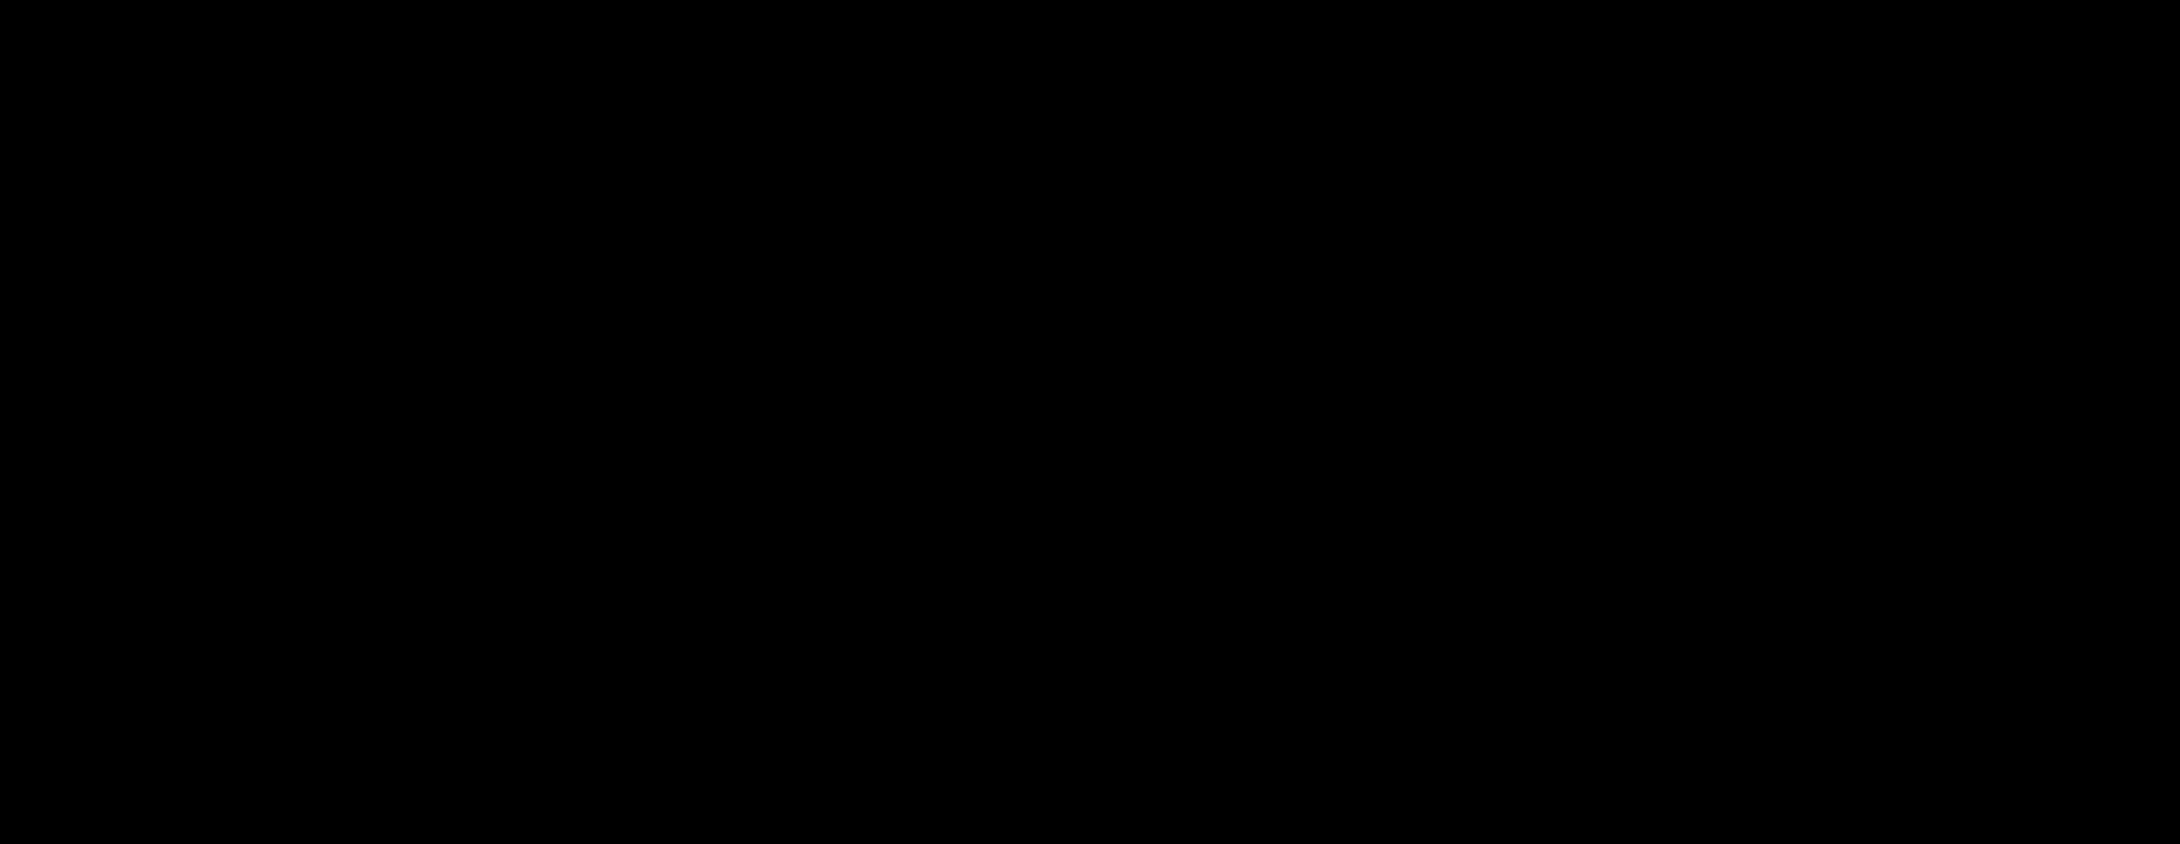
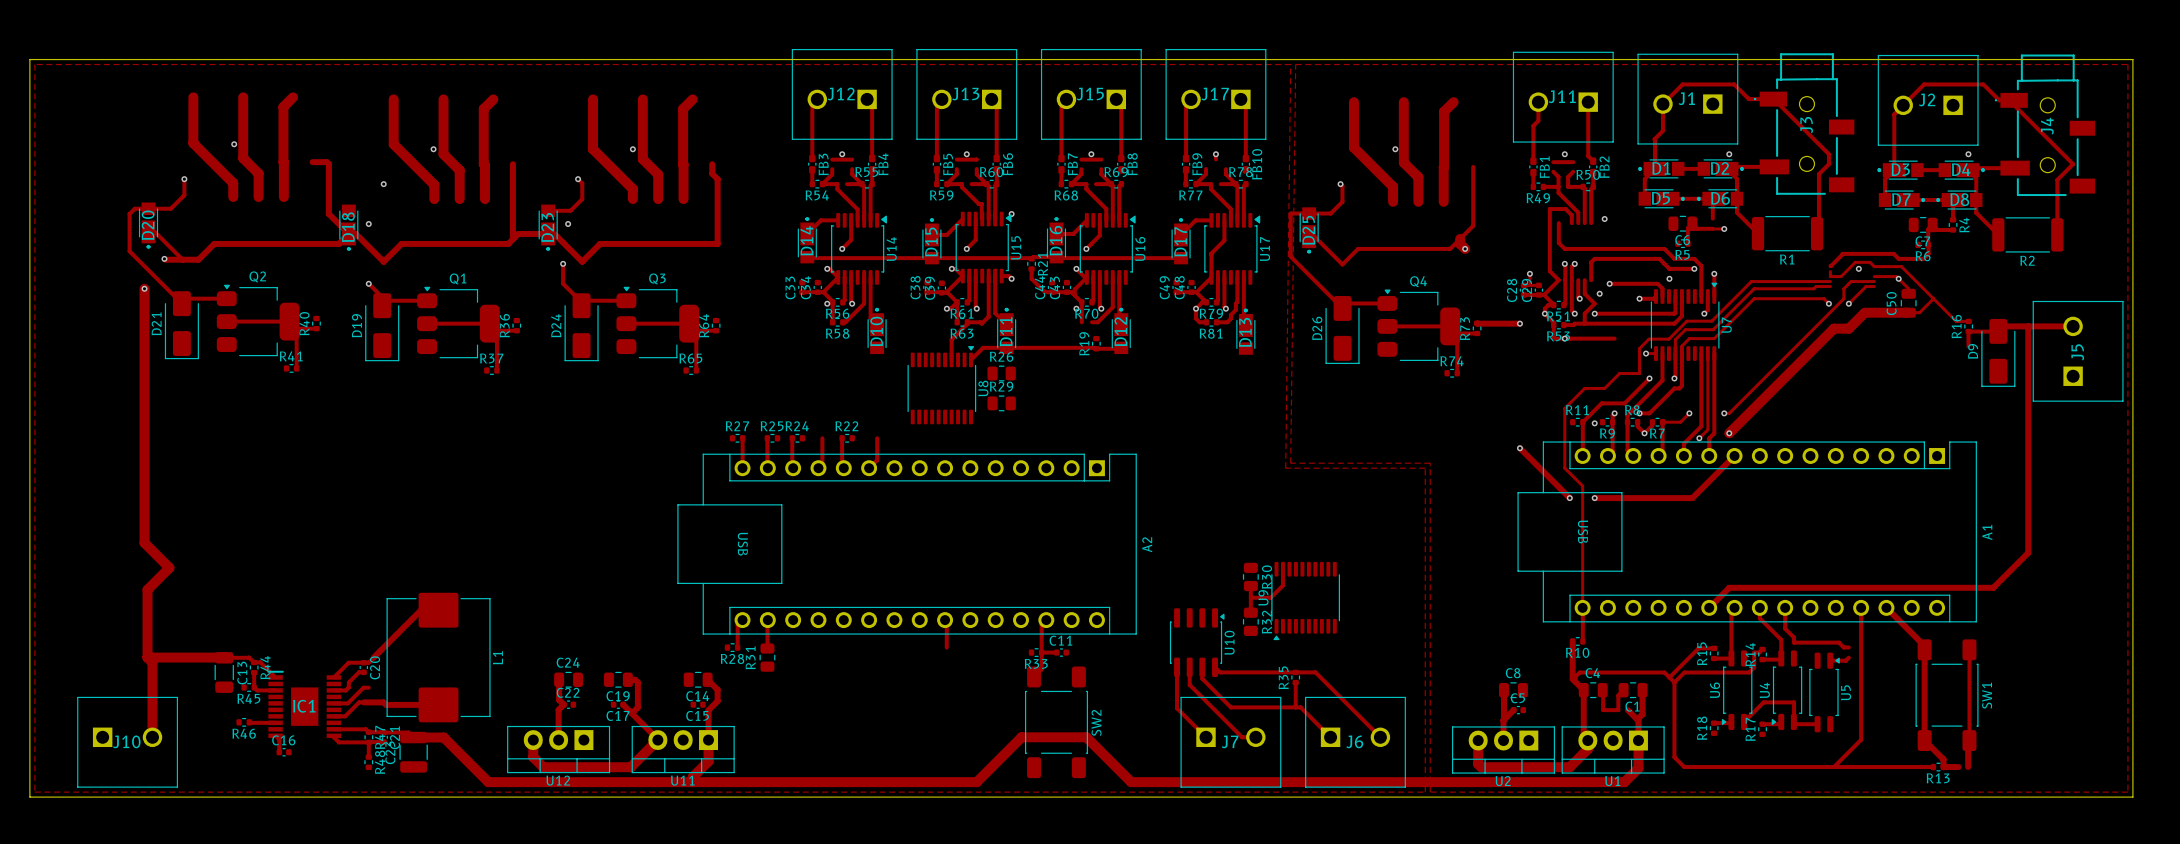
board edge: none -> (29, 59) (2132, 59) (2132, 797) (29, 797) (29, 59)
zone outline: none -> (34, 64) (1290, 64) (1285, 468) (1425, 468) (1425, 792) (34, 792) (34, 64)
zone outline: none -> (1295, 64) (2127, 64) (2127, 792) (1430, 792) (1430, 463) (1290, 463) (1295, 64)
J12: none -> (842, 94)
J13: none -> (966, 94)
J15: none -> (1091, 94)
J17: none -> (1215, 94)
track: none -> (193, 97) (193, 143) (233, 183) (233, 197)
track: none -> (243, 97) (243, 158) (258, 173) (258, 197)
track: none -> (293, 97) (283, 106) (283, 197)
J11: none -> (1563, 97)
track: none -> (393, 99) (393, 144) (434, 184) (434, 199)
track: none -> (443, 99) (443, 154) (459, 170) (459, 199)
track: none -> (493, 99) (483, 109) (484, 199)
track: none -> (593, 99) (593, 149) (632, 189) (632, 199)
track: none -> (642, 99) (642, 159) (658, 174) (658, 199)
track: none -> (692, 99) (683, 109) (683, 199)
track: none -> (817, 99) (812, 104) (812, 158)
track: none -> (867, 99) (872, 104) (872, 158)
track: none -> (941, 99) (936, 104) (936, 158)
track: none -> (991, 99) (996, 104) (996, 158)
track: none -> (1066, 99) (1061, 104) (1061, 158)
track: none -> (1116, 99) (1121, 104) (1121, 158)
track: none -> (1191, 99) (1186, 104) (1186, 158)
track: none -> (1240, 99) (1245, 104) (1245, 158)
J1: none -> (1687, 99)
J2: none -> (1928, 100)
track: none -> (1354, 102) (1354, 147) (1393, 186) (1393, 201)
track: none -> (1403, 102) (1403, 162) (1418, 177) (1418, 201)
track: none -> (1453, 102) (1444, 111) (1443, 201)
track: none -> (1538, 102) (1538, 120) (1533, 125) (1533, 161)
track: none -> (1588, 102) (1588, 156) (1593, 161)
J3: none -> (1804, 124)
J4: none -> (2044, 125)
via: none -> (234, 144)
via: none -> (433, 149)
via: none -> (632, 149)
via: none -> (1395, 149)
via: none -> (842, 154)
via: none -> (966, 154)
via: none -> (1091, 154)
track: none -> (1215, 154) (1215, 159)
via: none -> (1215, 154)
via: none -> (1564, 154)
via: none -> (1729, 154)
via: none -> (1968, 154)
track: none -> (832, 159) (852, 159)
track: none -> (976, 159) (956, 159)
track: none -> (1081, 159) (1101, 159)
track: none -> (312, 162) (326, 162) (328, 164) (328, 214) (348, 233)
track: none -> (1553, 162) (1573, 162)
track: none -> (512, 164) (513, 238)
track: none -> (712, 164) (712, 173) (717, 179) (717, 243) (600, 243) (582, 261) (554, 233) (518, 233) (508, 243) (401, 243) (383, 261) (355, 233) (348, 233)
FB3: none -> (812, 164)
FB4: none -> (872, 164)
FB5: none -> (936, 164)
FB6: none -> (996, 164)
FB7: none -> (1061, 164)
FB8: none -> (1121, 164)
FB9: none -> (1186, 164)
FB10: none -> (1245, 164)
track: none -> (1473, 166) (1473, 225) (1450, 248) (1358, 248) (1342, 264) (1314, 236) (1309, 236)
FB1: none -> (1533, 166)
FB2: none -> (1593, 166)
track: none -> (1774, 166) (1731, 166) (1727, 168) (1736, 178) (1736, 212) (1758, 233)
track: none -> (976, 168) (976, 174) (988, 186) (988, 219)
track: none -> (1205, 168) (1205, 174) (1196, 184) (1211, 184) (1211, 189) (1230, 209) (1230, 220)
D1: none -> (1661, 168)
track: none -> (1678, 168) (1703, 168)
D2: none -> (1720, 168)
track: none -> (2015, 168) (1970, 168) (1968, 170) (1976, 178) (1976, 212) (1998, 234)
track: none -> (812, 169) (812, 184)
track: none -> (832, 169) (832, 174) (822, 184) (837, 184) (837, 189) (857, 209) (857, 220)
track: none -> (852, 169) (852, 174) (864, 186) (864, 220)
track: none -> (872, 169) (872, 184)
track: none -> (936, 169) (936, 184)
track: none -> (956, 169) (956, 174) (946, 184) (962, 184) (962, 187) (978, 204) (981, 204) (982, 219)
track: none -> (1061, 169) (1061, 184)
track: none -> (1081, 169) (1081, 174) (1071, 184) (1086, 184) (1086, 189) (1106, 209) (1106, 220)
track: none -> (1101, 169) (1101, 174) (1112, 185) (1112, 220)
track: none -> (1186, 169) (1185, 184)
track: none -> (1225, 169) (1225, 174) (1237, 185) (1237, 220)
track: none -> (996, 170) (995, 219)
D3: none -> (1900, 170)
track: none -> (1917, 170) (1944, 170)
D4: none -> (1961, 170)
track: none -> (1553, 171) (1558, 176) (1558, 192) (1578, 212) (1578, 223)
track: none -> (1573, 171) (1568, 176) (1568, 186) (1584, 188) (1584, 223)
track: none -> (1533, 172) (1533, 186)
track: none -> (1593, 172) (1591, 223)
track: none -> (184, 179) (184, 195) (170, 208) (134, 208) (129, 214) (129, 251) (181, 303) (186, 298) (226, 298)
via: none -> (184, 179)
track: none -> (578, 179) (582, 183) (582, 199) (570, 210) (548, 210)
via: none -> (578, 179)
via: none -> (383, 184)
R54: none -> (817, 184)
track: none -> (846, 184) (862, 184)
R55: none -> (867, 184)
track: none -> (872, 184) (870, 185) (870, 220)
R59: none -> (941, 184)
track: none -> (971, 184) (986, 184)
R60: none -> (991, 184)
R68: none -> (1066, 184)
track: none -> (1095, 184) (1111, 184)
R69: none -> (1116, 184)
track: none -> (1121, 184) (1119, 186) (1119, 220)
R77: none -> (1190, 184)
track: none -> (1220, 184) (1235, 184)
R78: none -> (1240, 184)
track: none -> (1245, 184) (1243, 186) (1243, 220)
track: none -> (1340, 184) (1342, 186) (1342, 201) (1330, 213) (1290, 214) (1290, 256) (1342, 308) (1347, 303) (1387, 303)
via: none -> (1340, 184)
R49: none -> (1538, 186)
track: none -> (1543, 186) (1558, 186)
R50: none -> (1588, 186)
track: none -> (1644, 198) (1644, 179) (1655, 168) (1654, 139) (1662, 130) (1662, 104) (1682, 84) (1734, 84) (1748, 99) (1773, 99) (1828, 154) (1828, 164) (1818, 174) (1818, 231) (1817, 233)
D5: none -> (1661, 198)
track: none -> (1667, 198) (1713, 198) (1712, 218)
D6: none -> (1720, 198)
track: none -> (1885, 200) (1885, 179) (1894, 170) (1894, 114) (1924, 84) (1983, 84) (1999, 100) (2014, 100) (2014, 105) (2073, 164) (2057, 179) (2057, 234)
D7: none -> (1901, 200)
track: none -> (1908, 200) (1953, 200) (1953, 219)
D8: none -> (1959, 200)
via: none -> (1011, 214)
track: none -> (962, 219) (946, 234) (931, 234)
track: none -> (975, 219) (975, 239) (966, 248)
via: none -> (1604, 219)
track: none -> (838, 220) (820, 220) (807, 233)
track: none -> (851, 220) (851, 239) (842, 248)
track: none -> (1086, 220) (1073, 233) (1056, 233)
track: none -> (1099, 220) (1099, 235) (1086, 248)
track: none -> (1211, 220) (1195, 220) (1181, 234)
track: none -> (1224, 220) (1224, 240) (1210, 253) (1211, 277) (1196, 292) (1176, 292)
track: none -> (1558, 223) (1558, 242) (1564, 248) (1664, 248) (1674, 258) (1694, 258) (1701, 265) (1701, 296)
track: none -> (1571, 223) (1571, 215) (1565, 209) (1549, 209) (1549, 271) (1558, 280) (1544, 294)
C6: none -> (1682, 223)
via: none -> (368, 224)
via: none -> (568, 224)
C7: none -> (1923, 224)
R4: none -> (1953, 224)
D20: none -> (148, 225)
D18: none -> (348, 227)
D23: none -> (548, 227)
track: none -> (1724, 228) (1697, 228) (1692, 223) (1687, 228) (1687, 243)
via: none -> (1724, 228)
D25: none -> (1309, 230)
track: none -> (1953, 230) (1937, 230) (1932, 224) (1928, 229) (1928, 253) (1923, 258) (1898, 258) (1893, 253) (1842, 253) (1830, 266)
track: none -> (148, 231) (154, 231) (182, 259)
track: none -> (348, 233) (338, 243) (214, 243) (198, 259) (164, 258)
R1: none -> (1787, 233)
R2: none -> (2027, 234)
track: none -> (1460, 238) (1460, 243) (1465, 248)
D14: none -> (807, 240)
D16: none -> (1056, 240)
D15: none -> (931, 241)
D17: none -> (1181, 241)
R5: none -> (1682, 243)
R6: none -> (1923, 244)
U15: none -> (983, 247)
via: none -> (842, 248)
U14: none -> (858, 248)
via: none -> (966, 248)
via: none -> (1086, 248)
U16: none -> (1107, 248)
U17: none -> (1232, 248)
via: none -> (1465, 248)
track: none -> (807, 257) (1181, 258)
via: none -> (164, 258)
track: none -> (563, 263) (563, 283) (581, 302) (581, 305) (586, 300) (626, 300)
via: none -> (563, 263)
R21: none -> (1031, 263)
track: none -> (1564, 263) (1563, 305)
via: none -> (1564, 263)
track: none -> (1574, 263) (1571, 266) (1571, 310) (1574, 313)
via: none -> (1574, 263)
track: none -> (827, 268) (838, 277) (823, 292)
via: none -> (827, 268)
track: none -> (951, 268) (955, 268) (962, 276) (947, 292)
via: none -> (951, 268)
track: none -> (1031, 268) (1031, 278) (1044, 292) (1071, 292) (1081, 302) (1081, 322)
track: none -> (1076, 268) (1086, 277) (1074, 289) (1074, 295)
via: none -> (1076, 268)
track: none -> (1694, 268) (1669, 268) (1659, 258) (1594, 258) (1591, 262) (1591, 280)
via: none -> (1694, 268)
via: none -> (1858, 268)
track: none -> (1830, 271) (1830, 276) (1841, 276) (1855, 262) (1870, 262) (1874, 266) (1901, 266) (1956, 321) (1968, 321)
track: none -> (1529, 273) (1529, 285)
via: none -> (1529, 273)
track: none -> (1714, 273) (1714, 296)
via: none -> (1714, 273)
track: none -> (969, 276) (969, 300) (967, 302)
track: none -> (975, 276) (976, 308)
track: none -> (988, 276) (988, 316) (981, 323) (967, 322) (951, 339) (951, 359)
track: none -> (995, 276) (995, 313) (1006, 324)
track: none -> (1001, 276) (1008, 276) (1011, 278)
track: none -> (1874, 276) (1896, 276) (1908, 288) (1908, 293)
track: none -> (844, 277) (844, 300) (842, 302)
track: none -> (851, 277) (852, 303)
track: none -> (864, 277) (864, 303) (845, 322) (842, 322)
track: none -> (870, 277) (870, 318) (877, 324)
track: none -> (1093, 277) (1091, 302)
track: none -> (1099, 277) (1101, 308)
track: none -> (1112, 277) (1112, 307) (1097, 322) (1091, 322)
track: none -> (1119, 277) (1119, 322) (1121, 324)
track: none -> (1217, 277) (1216, 302)
track: none -> (1224, 277) (1225, 308)
track: none -> (1237, 277) (1235, 309) (1227, 322) (1216, 322)
track: none -> (1243, 277) (1243, 323) (1245, 325)
via: none -> (1011, 278)
via: none -> (1669, 278)
via: none -> (1898, 278)
track: none -> (1578, 280) (1579, 298)
track: none -> (1584, 280) (1584, 293) (1594, 303) (1584, 313) (1584, 323)
track: none -> (1830, 281) (1751, 281) (1711, 321) (1686, 321) (1668, 339) (1649, 339) (1639, 348) (1639, 373) (1619, 373) (1604, 388) (1584, 388) (1564, 408) (1564, 468) (1582, 486) (1582, 641)
track: none -> (1874, 281) (1851, 281) (1843, 288) (1843, 298) (1729, 413) (1724, 413)
track: none -> (368, 283) (382, 297) (382, 305) (387, 300) (427, 300)
via: none -> (368, 283)
track: none -> (1609, 283) (1657, 283) (1662, 288) (1662, 296)
via: none -> (1609, 283)
track: none -> (1523, 285) (1538, 285)
track: none -> (1830, 286) (1816, 286) (1813, 288) (1754, 288) (1713, 329) (1685, 329) (1675, 339) (1674, 378)
track: none -> (1874, 286) (1866, 286) (1848, 303)
C33: none -> (802, 287)
C34: none -> (817, 287)
C38: none -> (927, 287)
C39: none -> (941, 287)
C44: none -> (1052, 287)
C43: none -> (1066, 287)
C49: none -> (1176, 287)
C48: none -> (1191, 287)
track: none -> (144, 288) (144, 542) (169, 567) (147, 589) (147, 657)
via: none -> (144, 288)
C28: none -> (1523, 290)
C29: none -> (1538, 290)
track: none -> (802, 292) (823, 292)
track: none -> (823, 292) (832, 301) (832, 322)
track: none -> (927, 292) (947, 292)
track: none -> (947, 292) (957, 302)
track: none -> (1196, 292) (1206, 302) (1202, 302) (1196, 308) (1196, 318) (1199, 322) (1206, 322)
via: none -> (1599, 293)
track: none -> (1523, 294) (1544, 294)
track: none -> (1544, 294) (1553, 304) (1548, 305) (1544, 308) (1544, 313) (1553, 322) (1554, 338) (1614, 338)
track: none -> (1656, 296) (1653, 298) (1639, 298)
track: none -> (1675, 296) (1674, 313) (1594, 313)
track: none -> (1681, 296) (1681, 316) (1674, 323) (1563, 325)
track: none -> (1707, 296) (1707, 310) (1704, 313)
via: none -> (1579, 298)
via: none -> (1639, 298)
track: none -> (1933, 298) (1919, 312) (1864, 312) (1848, 328) (1833, 328) (1729, 433)
R56: none -> (837, 302)
track: none -> (957, 302) (950, 308) (946, 308)
track: none -> (957, 302) (957, 322)
R61: none -> (962, 302)
R70: none -> (1086, 302)
R79: none -> (1211, 302)
via: none -> (827, 303)
via: none -> (852, 303)
track: none -> (1828, 303) (1823, 298) (1754, 298) (1714, 338) (1689, 338) (1681, 346) (1681, 385) (1679, 388) (1674, 388) (1649, 413) (1639, 413)
via: none -> (1828, 303)
via: none -> (1848, 303)
C50: none -> (1908, 303)
R51: none -> (1558, 305)
via: none -> (946, 308)
via: none -> (976, 308)
via: none -> (1076, 308)
via: none -> (1101, 308)
via: none -> (1196, 308)
via: none -> (1225, 308)
via: none -> (1544, 313)
via: none -> (1574, 313)
via: none -> (1594, 313)
via: none -> (1704, 313)
Q2: none -> (258, 320)
track: none -> (226, 321) (289, 321) (296, 328)
U7: none -> (1685, 321)
Q1: none -> (458, 322)
Q3: none -> (657, 322)
R58: none -> (837, 322)
R63: none -> (962, 322)
R81: none -> (1211, 322)
R40: none -> (316, 323)
track: none -> (427, 323) (489, 323) (496, 330)
track: none -> (626, 323) (689, 323) (696, 330)
track: none -> (1477, 323) (1519, 323)
via: none -> (1519, 323)
D21: none -> (181, 325)
R36: none -> (516, 325)
R64: none -> (716, 325)
Q4: none -> (1418, 325)
R53: none -> (1558, 325)
track: none -> (1387, 326) (1450, 326) (1457, 333)
R16: none -> (1968, 326)
track: none -> (2028, 326) (2028, 552) (1993, 587) (1729, 587) (1709, 607)
track: none -> (2073, 326) (2003, 326) (1998, 331) (1968, 331) (1968, 346)
D19: none -> (382, 327)
D24: none -> (581, 327)
track: none -> (296, 328) (296, 368)
track: none -> (296, 328) (316, 328)
R73: none -> (1477, 328)
D26: none -> (1342, 329)
track: none -> (496, 330) (496, 370)
track: none -> (496, 330) (516, 330)
track: none -> (696, 330) (716, 330)
track: none -> (696, 330) (696, 370)
D10: none -> (877, 330)
D11: none -> (1006, 330)
D12: none -> (1121, 330)
D13: none -> (1245, 331)
track: none -> (1457, 333) (1477, 333)
track: none -> (1457, 333) (1457, 373)
via: none -> (1564, 338)
R19: none -> (1096, 343)
track: none -> (1121, 347) (983, 347) (971, 359)
J5: none -> (2078, 351)
D9: none -> (1998, 352)
track: none -> (1646, 353) (1656, 353)
via: none -> (1646, 353)
track: none -> (1662, 353) (1662, 380) (1627, 415) (1627, 450) (1633, 455)
track: none -> (1701, 353) (1701, 426) (1683, 443) (1683, 455)
track: none -> (1707, 353) (1707, 429) (1699, 438)
track: none -> (1714, 353) (1714, 433) (1709, 438) (1709, 455)
R41: none -> (291, 368)
R37: none -> (491, 370)
R65: none -> (691, 370)
R26: none -> (1001, 373)
R74: none -> (1452, 373)
track: none -> (1649, 378) (1624, 403) (1601, 403) (1582, 422) (1582, 455)
via: none -> (1649, 378)
via: none -> (1674, 378)
U8: none -> (941, 385)
R29: none -> (1001, 403)
track: none -> (1614, 413) (1612, 415) (1612, 451) (1607, 455)
via: none -> (1614, 413)
via: none -> (1639, 413)
track: none -> (1689, 413) (1680, 422) (1662, 422) (1662, 451) (1658, 455)
via: none -> (1689, 413)
via: none -> (1724, 413)
R11: none -> (1577, 422)
R9: none -> (1607, 422)
R8: none -> (1632, 422)
track: none -> (1637, 422) (1637, 426) (1644, 433) (1652, 425) (1652, 422)
R7: none -> (1657, 422)
via: none -> (1594, 423)
via: none -> (1644, 433)
via: none -> (1729, 433)
R27: none -> (737, 438)
track: none -> (742, 438) (742, 468)
track: none -> (767, 438) (767, 468)
R25: none -> (772, 438)
track: none -> (792, 438) (793, 468)
R24: none -> (797, 438)
track: none -> (822, 438) (822, 464) (818, 468)
track: none -> (842, 438) (842, 466) (843, 468)
R22: none -> (847, 438)
track: none -> (877, 438) (877, 460) (869, 468)
via: none -> (1699, 438)
track: none -> (1519, 448) (1569, 498)
via: none -> (1519, 448)
track: none -> (1734, 455) (1692, 498) (1594, 498)
via: none -> (1569, 498)
via: none -> (1594, 498)
A1: none -> (1747, 531)
A2: none -> (907, 544)
track: none -> (1282, 569) (1282, 585) (1270, 597) (1250, 597)
R30: none -> (1250, 576)
track: none -> (1250, 586) (1250, 612)
U9: none -> (1305, 600)
track: none -> (1734, 607) (1731, 611) (1731, 658)
track: none -> (1759, 607) (1759, 618) (1781, 639) (1781, 658) (1762, 659)
track: none -> (1785, 607) (1785, 628) (1794, 637) (1794, 642) (1838, 642) (1843, 647) (1848, 647)
track: none -> (1861, 607) (1861, 739) (1833, 767)
track: none -> (1886, 607) (1924, 646) (1924, 740) (1943, 759) (1943, 767) (1958, 767)
track: none -> (438, 610) (421, 610) (368, 662) (348, 662) (333, 677)
track: none -> (742, 620) (737, 624) (737, 647)
track: none -> (767, 620) (767, 648)
track: none -> (945, 620) (946, 621) (946, 647)
track: none -> (1046, 620) (1041, 624) (1041, 669) (1034, 676)
R32: none -> (1250, 621)
track: none -> (1572, 641) (1572, 679) (1583, 690) (1583, 736) (1587, 740) (1587, 749) (1569, 767) (1481, 767) (1478, 764) (1478, 740)
R10: none -> (1577, 641)
U10: none -> (1197, 642)
R28: none -> (732, 647)
track: none -> (1714, 648) (1698, 648) (1669, 677)
track: none -> (1762, 649) (1759, 652) (1754, 652) (1754, 667) (1749, 672) (1684, 672) (1674, 682)
track: none -> (1969, 649) (1968, 767)
R33: none -> (1036, 652)
track: none -> (1041, 652) (1056, 652)
C11: none -> (1061, 652)
R15: none -> (1714, 653)
R14: none -> (1762, 654)
track: none -> (147, 657) (249, 657) (254, 662) (260, 662) (275, 677)
track: none -> (147, 657) (152, 662) (152, 737)
L1: none -> (438, 657)
R31: none -> (767, 657)
track: none -> (1848, 657) (1845, 660) (1830, 660)
track: none -> (1714, 658) (1731, 658)
R44: none -> (254, 667)
C20: none -> (363, 667)
track: none -> (1177, 667) (1177, 708) (1205, 737)
track: none -> (1189, 667) (1189, 684) (1242, 737) (1255, 737)
track: none -> (1202, 667) (1202, 678) (1230, 707) (1300, 707) (1330, 737)
track: none -> (1215, 667) (1220, 672) (1315, 672) (1380, 737)
C13: none -> (224, 672)
track: none -> (254, 672) (254, 687) (257, 690) (275, 690)
track: none -> (363, 672) (359, 672) (348, 682) (348, 687) (345, 690) (333, 690)
R35: none -> (1295, 677)
track: none -> (559, 679) (559, 699) (563, 704) (558, 709) (558, 740)
C24: none -> (568, 679)
C19: none -> (618, 679)
track: none -> (627, 679) (635, 679) (637, 682) (637, 707) (631, 713)
C14: none -> (698, 679)
track: none -> (707, 679) (717, 689) (717, 701) (708, 710) (708, 761) (692, 777) (692, 782)
track: none -> (1575, 681) (1575, 676) (1579, 672) (1664, 672) (1674, 682)
track: none -> (1295, 682) (1295, 707)
track: none -> (1674, 682) (1674, 757) (1684, 767) (1933, 767)
R45: none -> (249, 687)
track: none -> (368, 687) (363, 687) (347, 703) (333, 703)
track: none -> (1504, 690) (1504, 719)
C8: none -> (1513, 690)
C4: none -> (1593, 690)
track: none -> (1602, 690) (1603, 710) (1618, 710) (1618, 695) (1623, 690)
C1: none -> (1633, 690)
track: none -> (1642, 690) (1642, 714) (1637, 719)
U6: none -> (1737, 690)
U4: none -> (1786, 690)
U5: none -> (1824, 692)
SW1: none -> (1947, 695)
IC1: none -> (304, 704)
track: none -> (438, 704) (386, 704) (383, 702) (359, 702) (345, 716) (333, 716)
C22: none -> (568, 704)
C17: none -> (618, 704)
track: none -> (623, 704) (657, 739) (657, 742)
C15: none -> (698, 704)
track: none -> (1513, 710) (1503, 720) (1503, 740)
C5: none -> (1518, 710)
track: none -> (1627, 710) (1638, 720) (1638, 768) (1624, 782) (1131, 782) (1086, 737) (1021, 737) (976, 782) (488, 782) (443, 737) (413, 737) (408, 732) (368, 732) (365, 729) (333, 729)
track: none -> (1731, 721) (1714, 723)
track: none -> (1744, 721) (1763, 702) (1794, 702) (1793, 721) (1796, 724) (1817, 724)
track: none -> (1781, 721) (1779, 724) (1762, 724)
R46: none -> (244, 722)
track: none -> (249, 722) (275, 722)
SW2: none -> (1056, 722)
R18: none -> (1714, 728)
R17: none -> (1762, 729)
track: none -> (275, 735) (279, 739) (279, 752)
track: none -> (333, 735) (338, 742) (368, 742)
R47: none -> (368, 737)
C21: none -> (383, 737)
track: none -> (533, 740) (533, 757) (543, 767) (630, 767) (657, 740)
J10: none -> (127, 742)
track: none -> (383, 742) (368, 742) (368, 757)
J7: none -> (1230, 742)
J6: none -> (1355, 742)
U12: none -> (558, 749)
U11: none -> (683, 749)
U2: none -> (1503, 750)
U1: none -> (1613, 750)
C16: none -> (284, 752)
C23: none -> (413, 752)
R48: none -> (368, 762)
R13: none -> (1938, 767)

